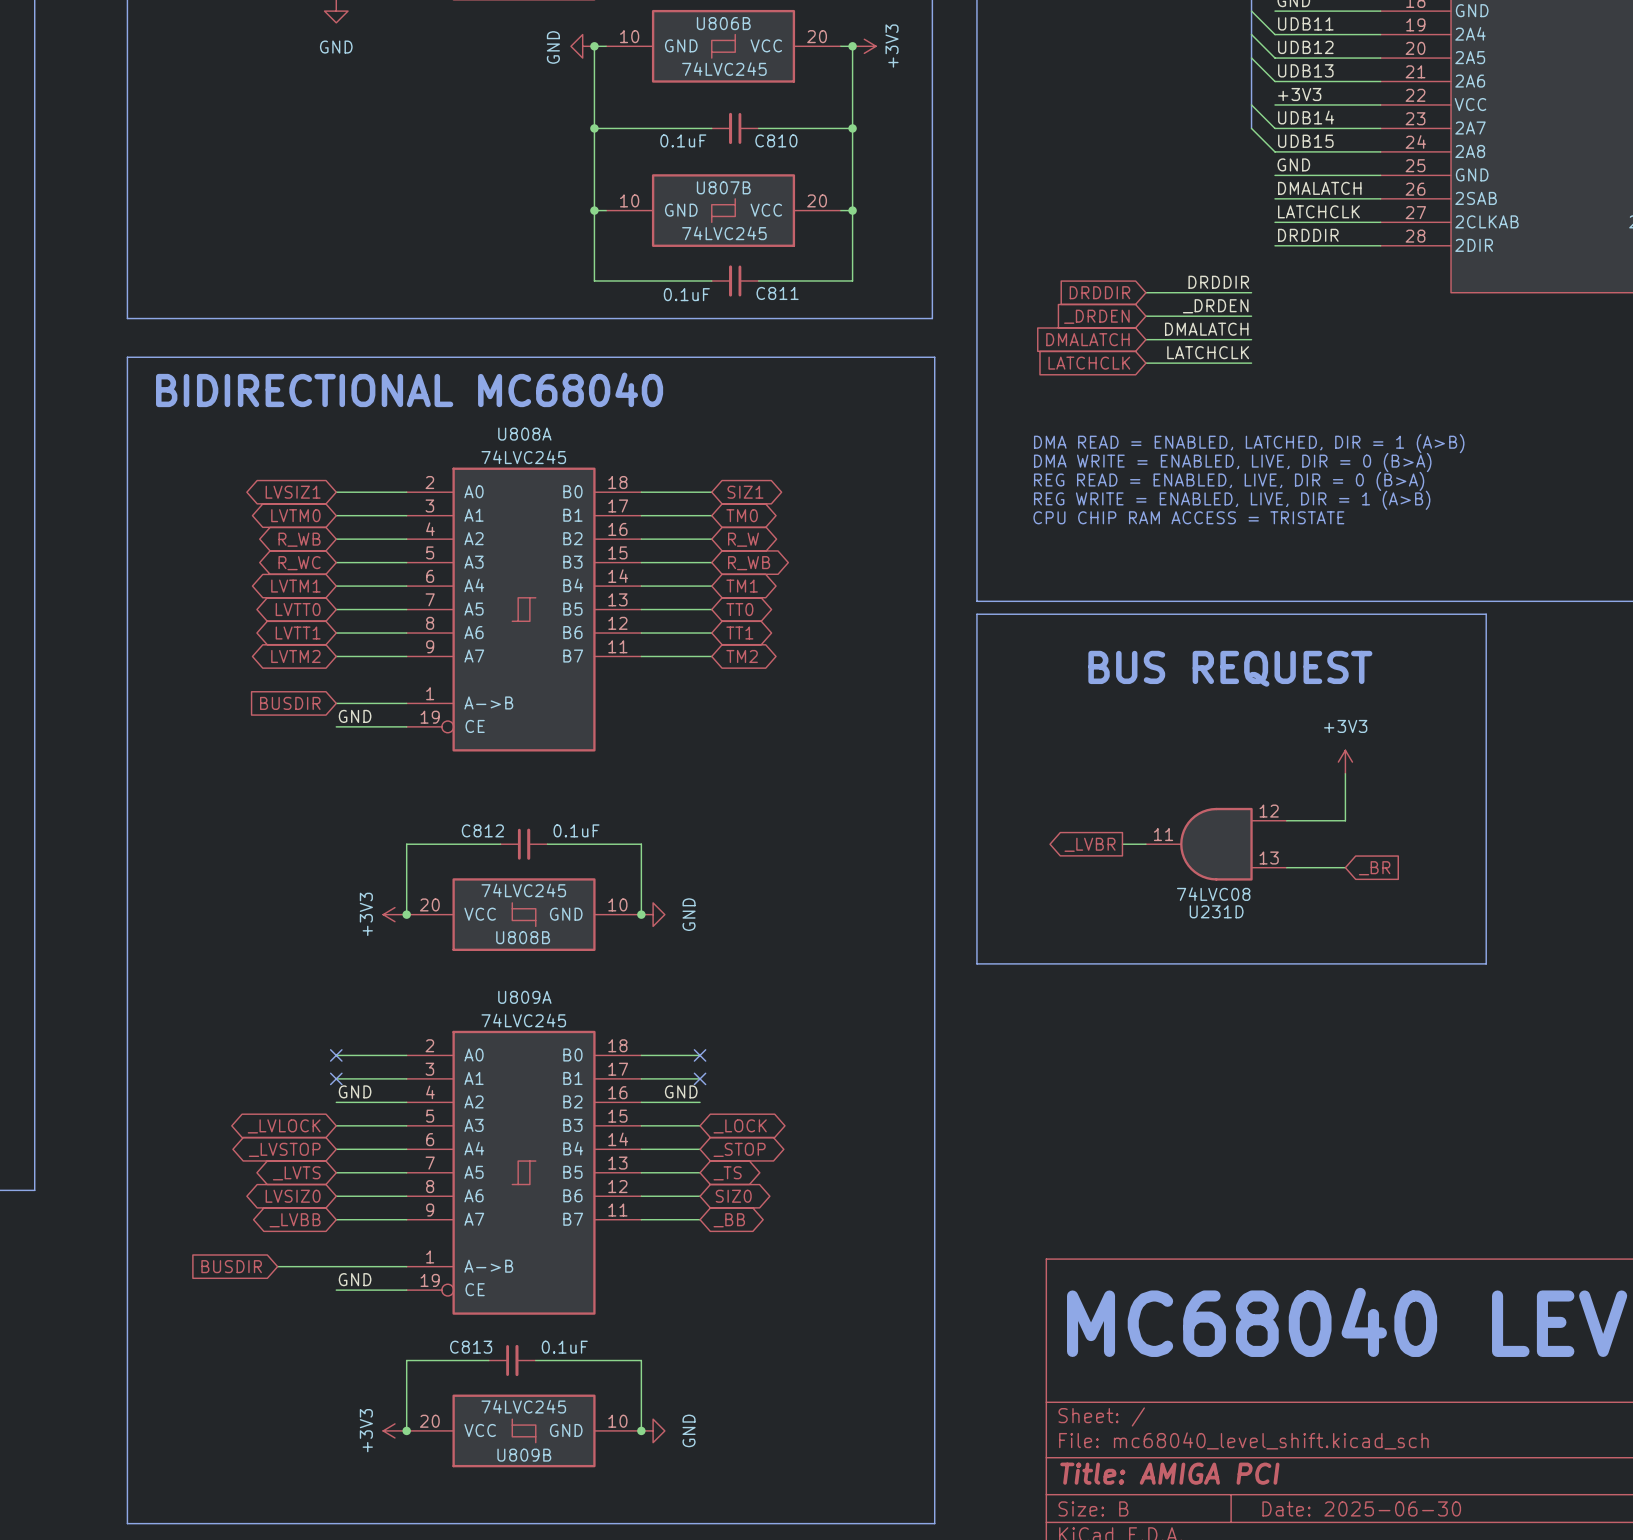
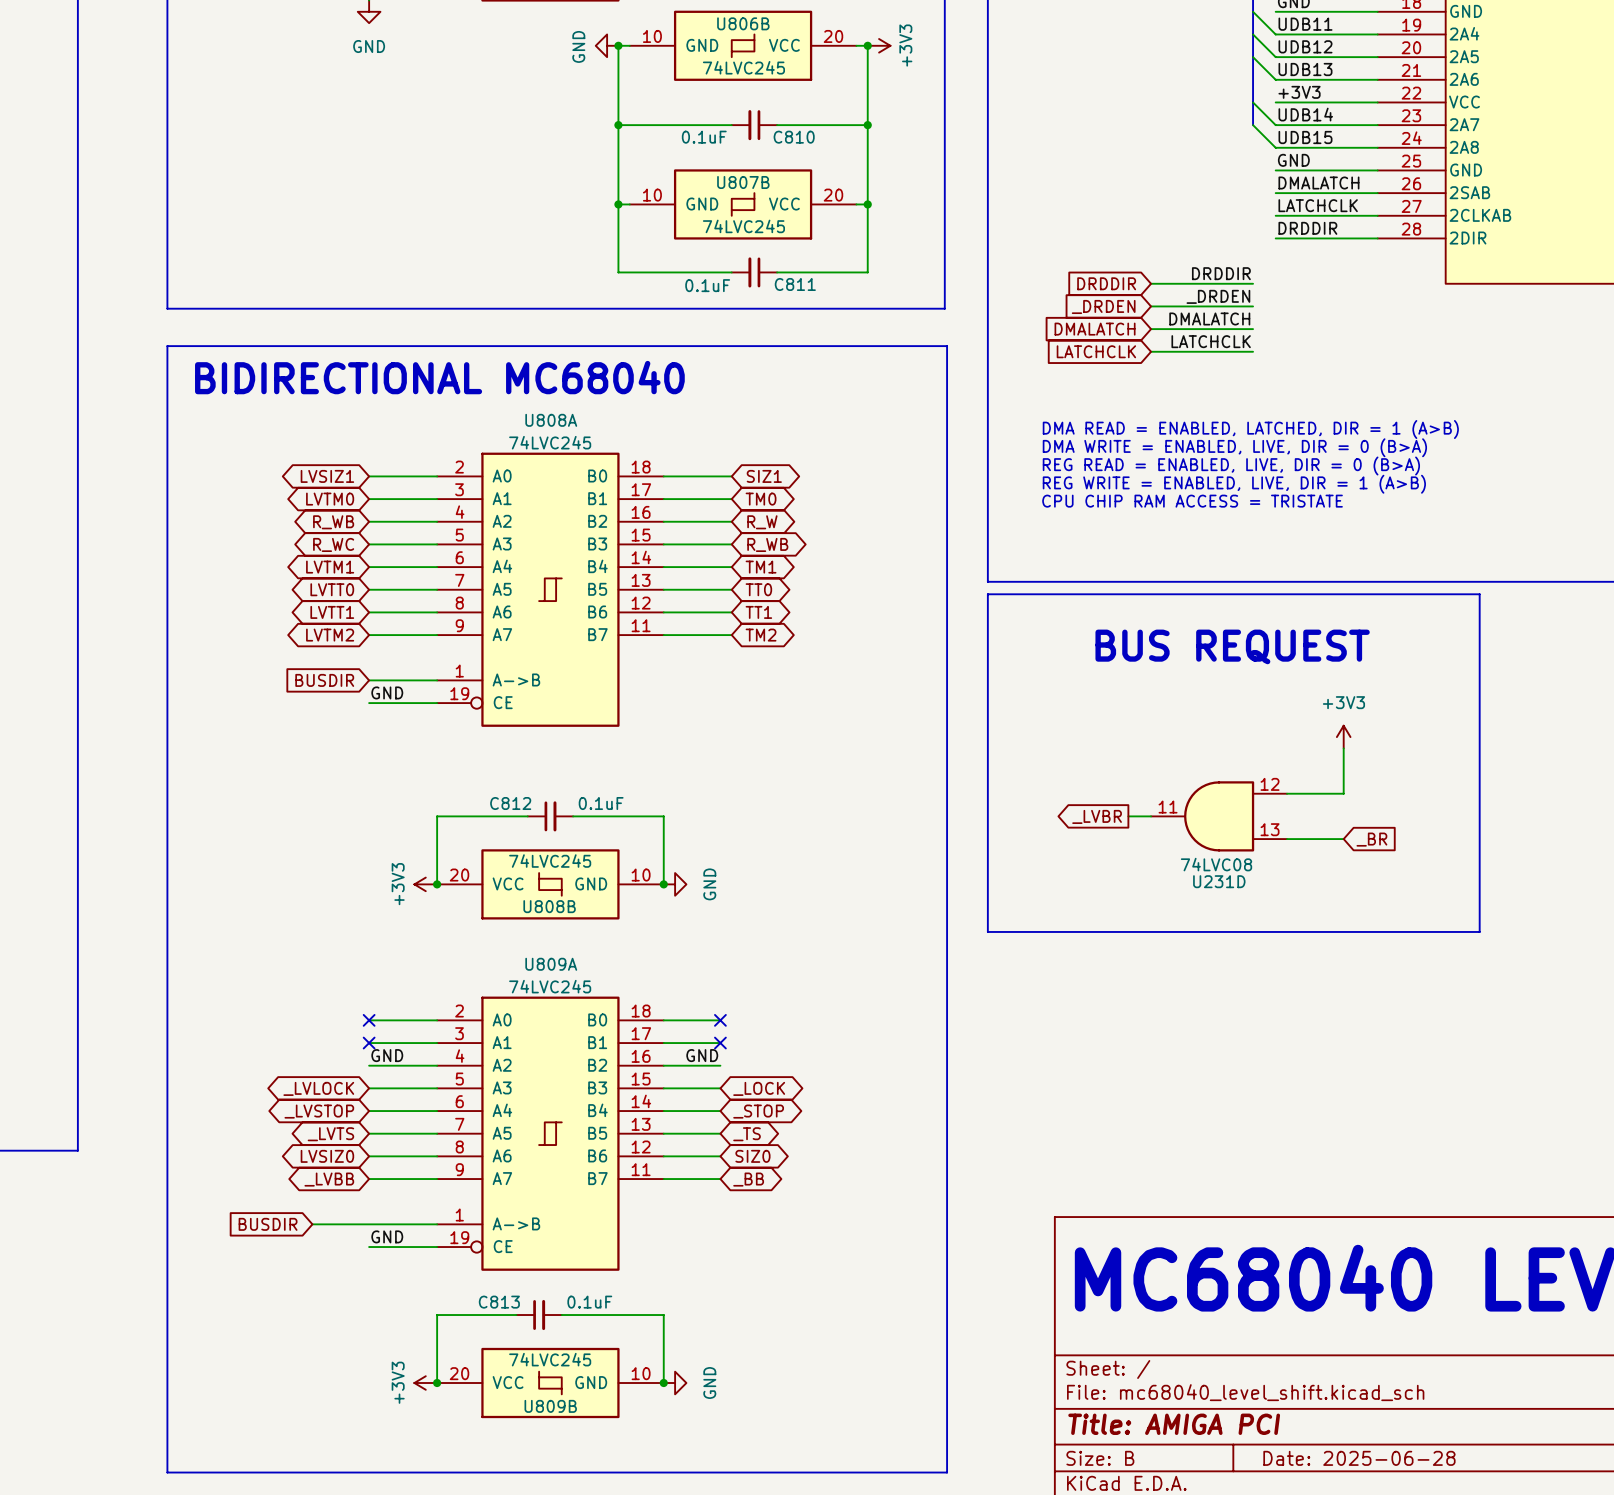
title block: Date: 2025-06-30 (1361, 1508) -> Date: 2025-06-28 (1359, 1458)

